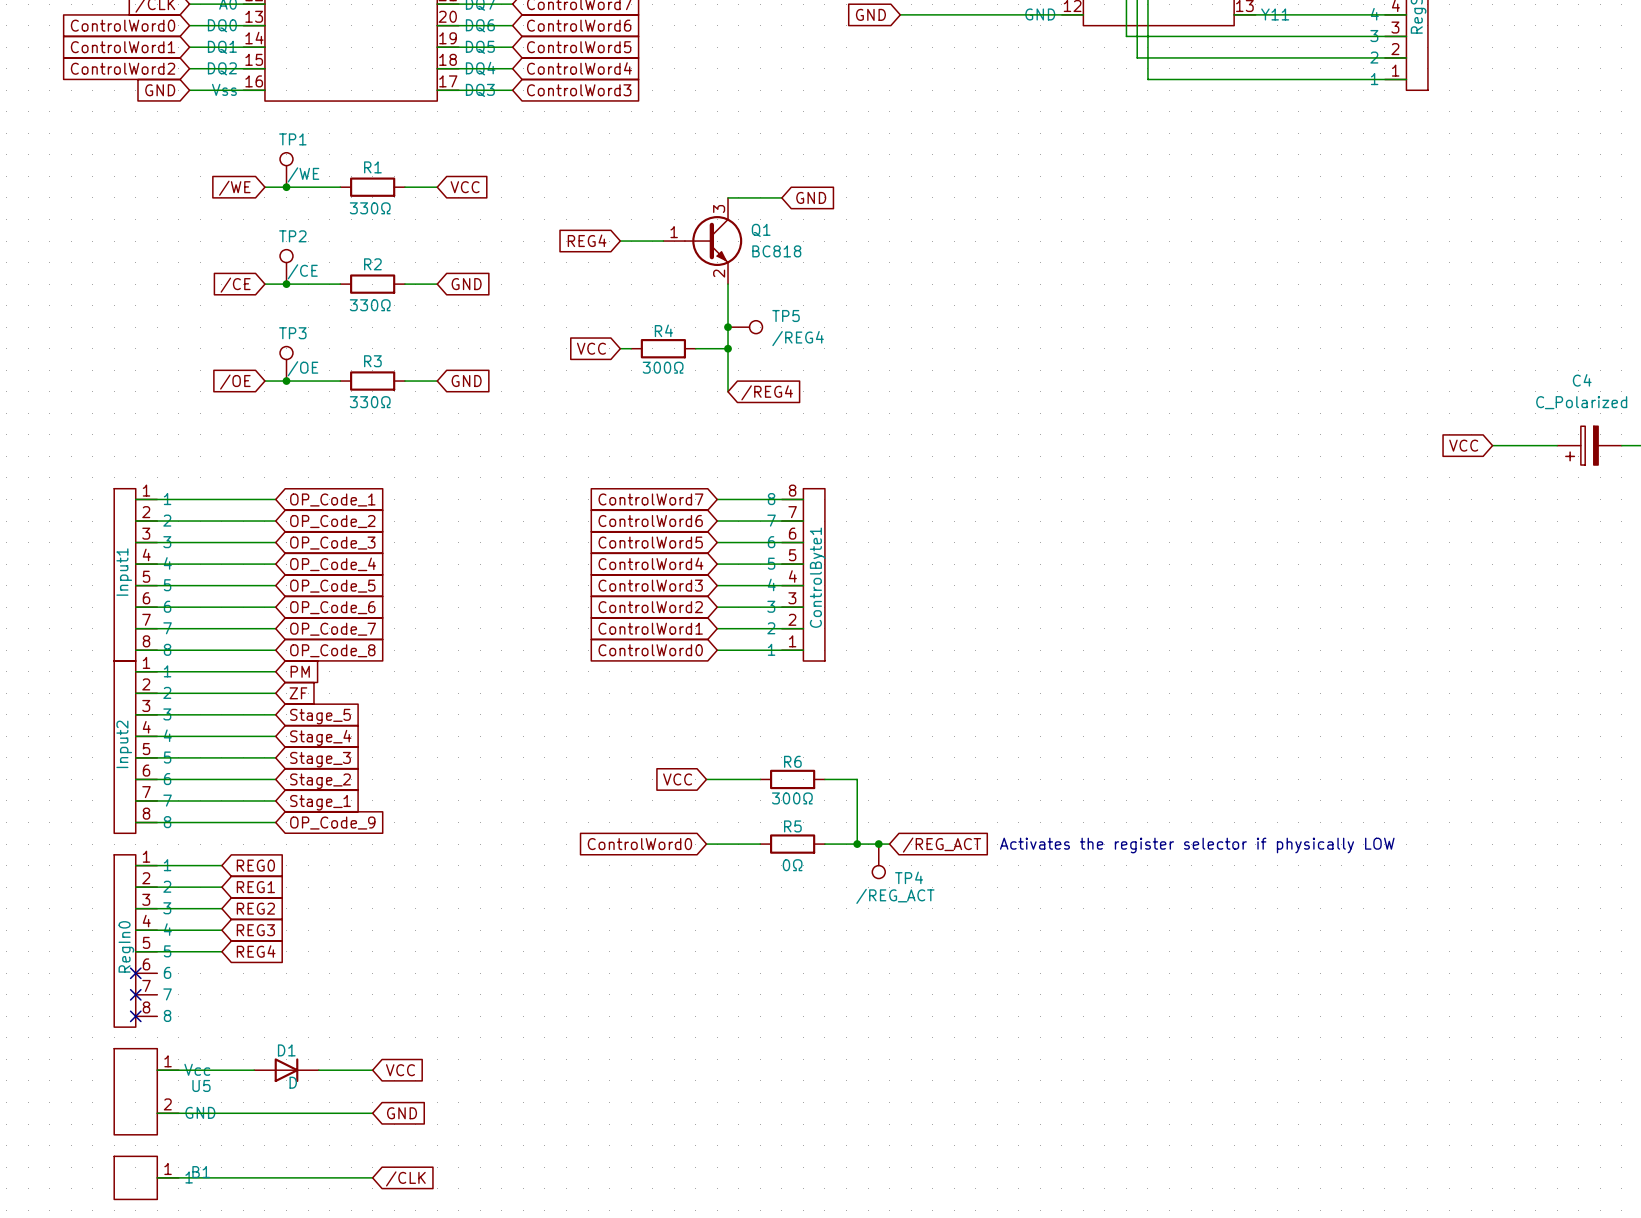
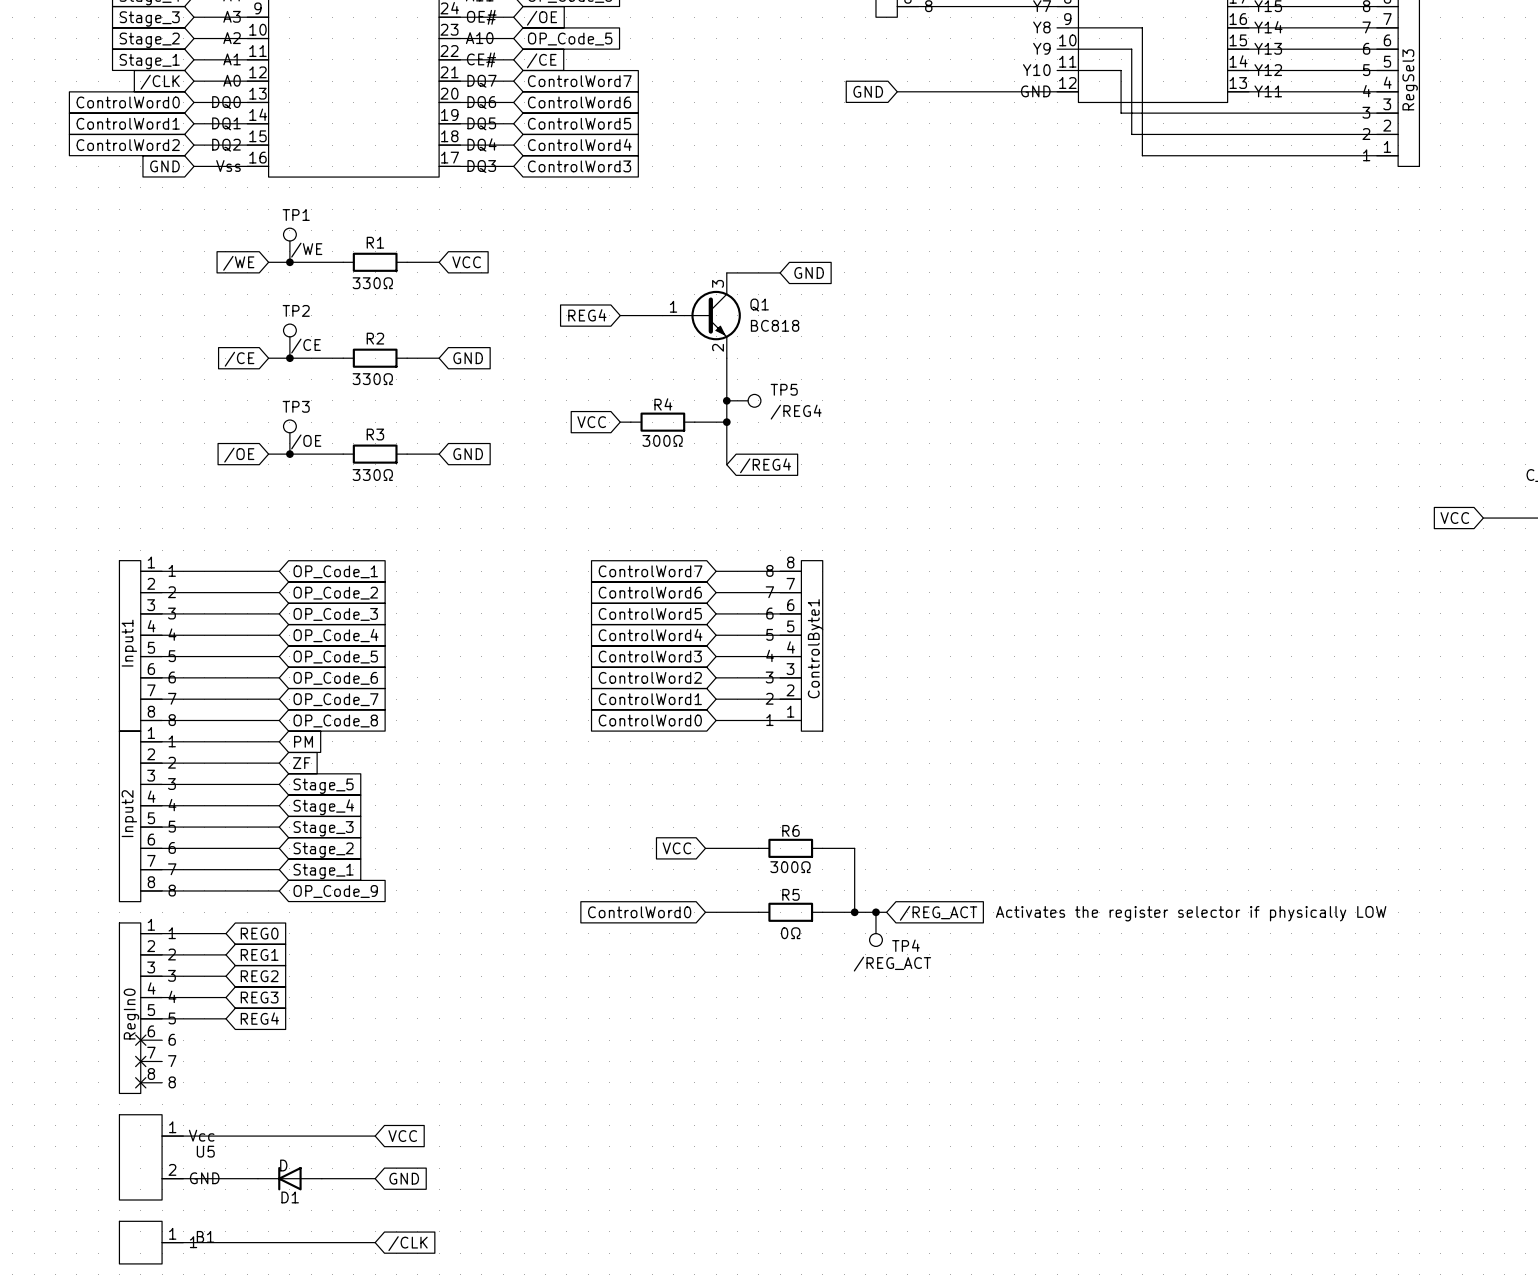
D1 rotation: 0° (286, 1070) -> 180° (289, 1178)
D1 position: (286, 1070) -> (289, 1178)

